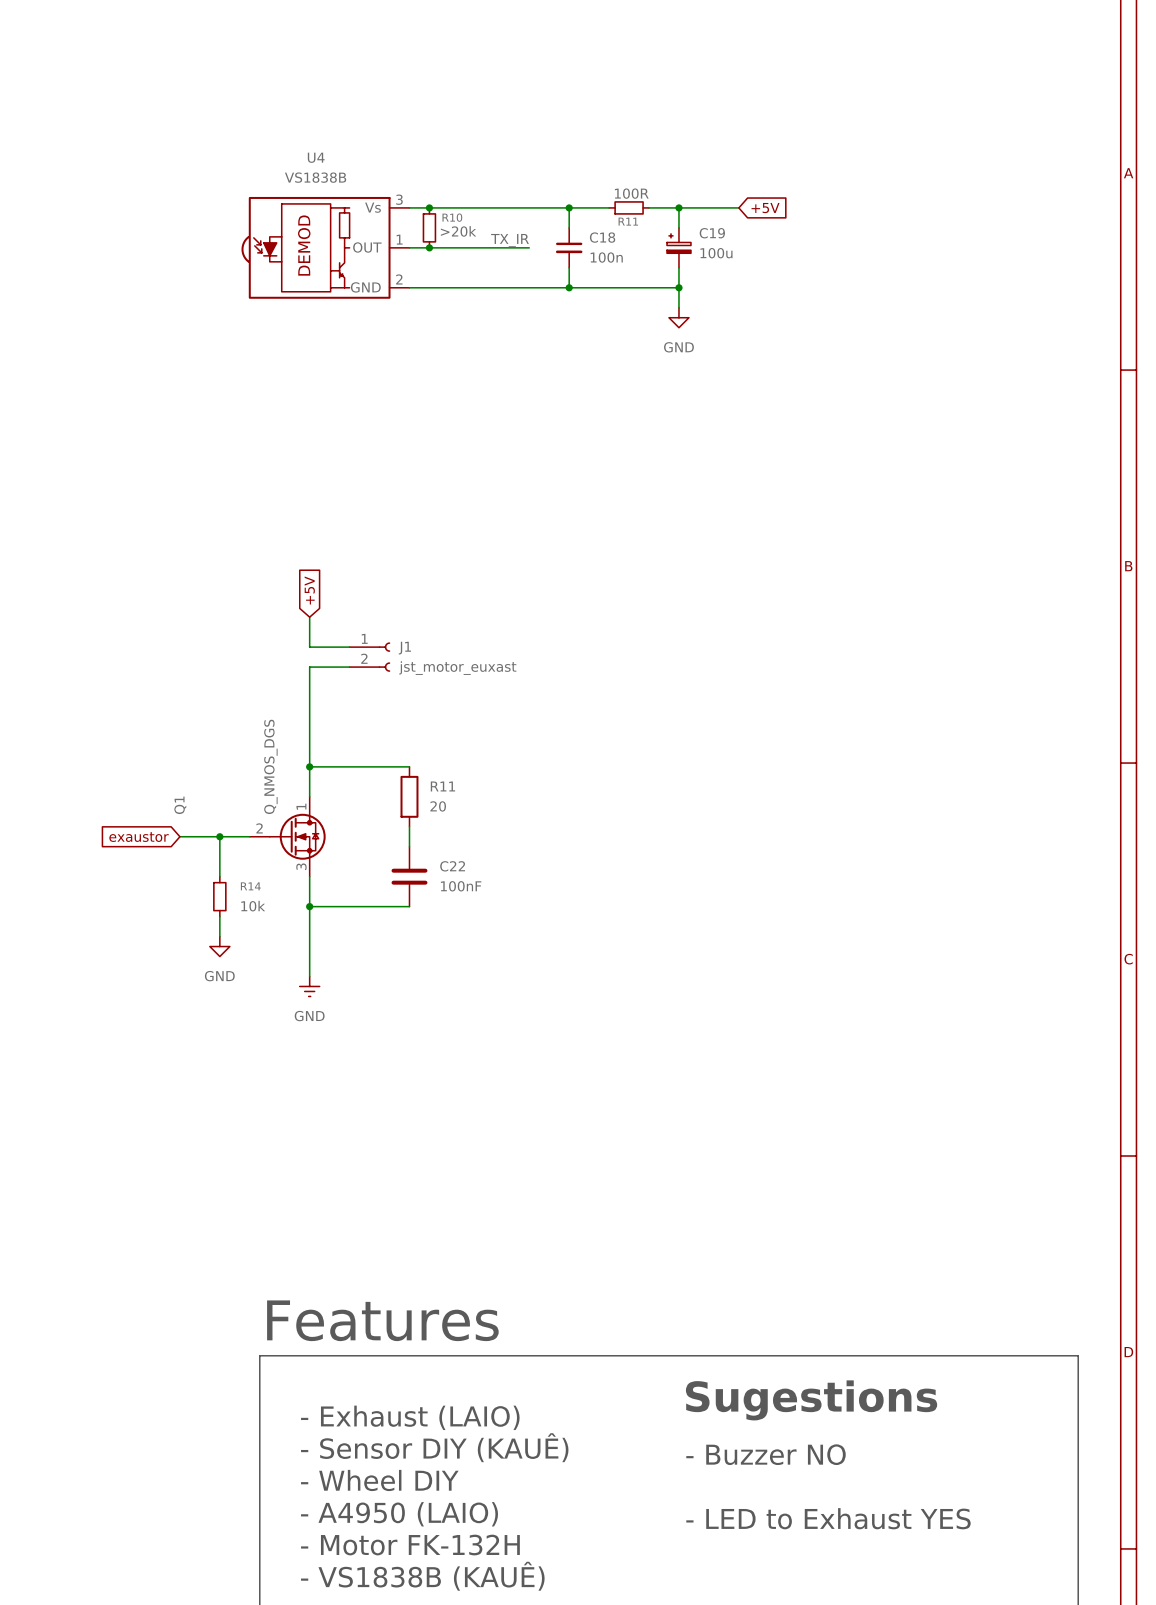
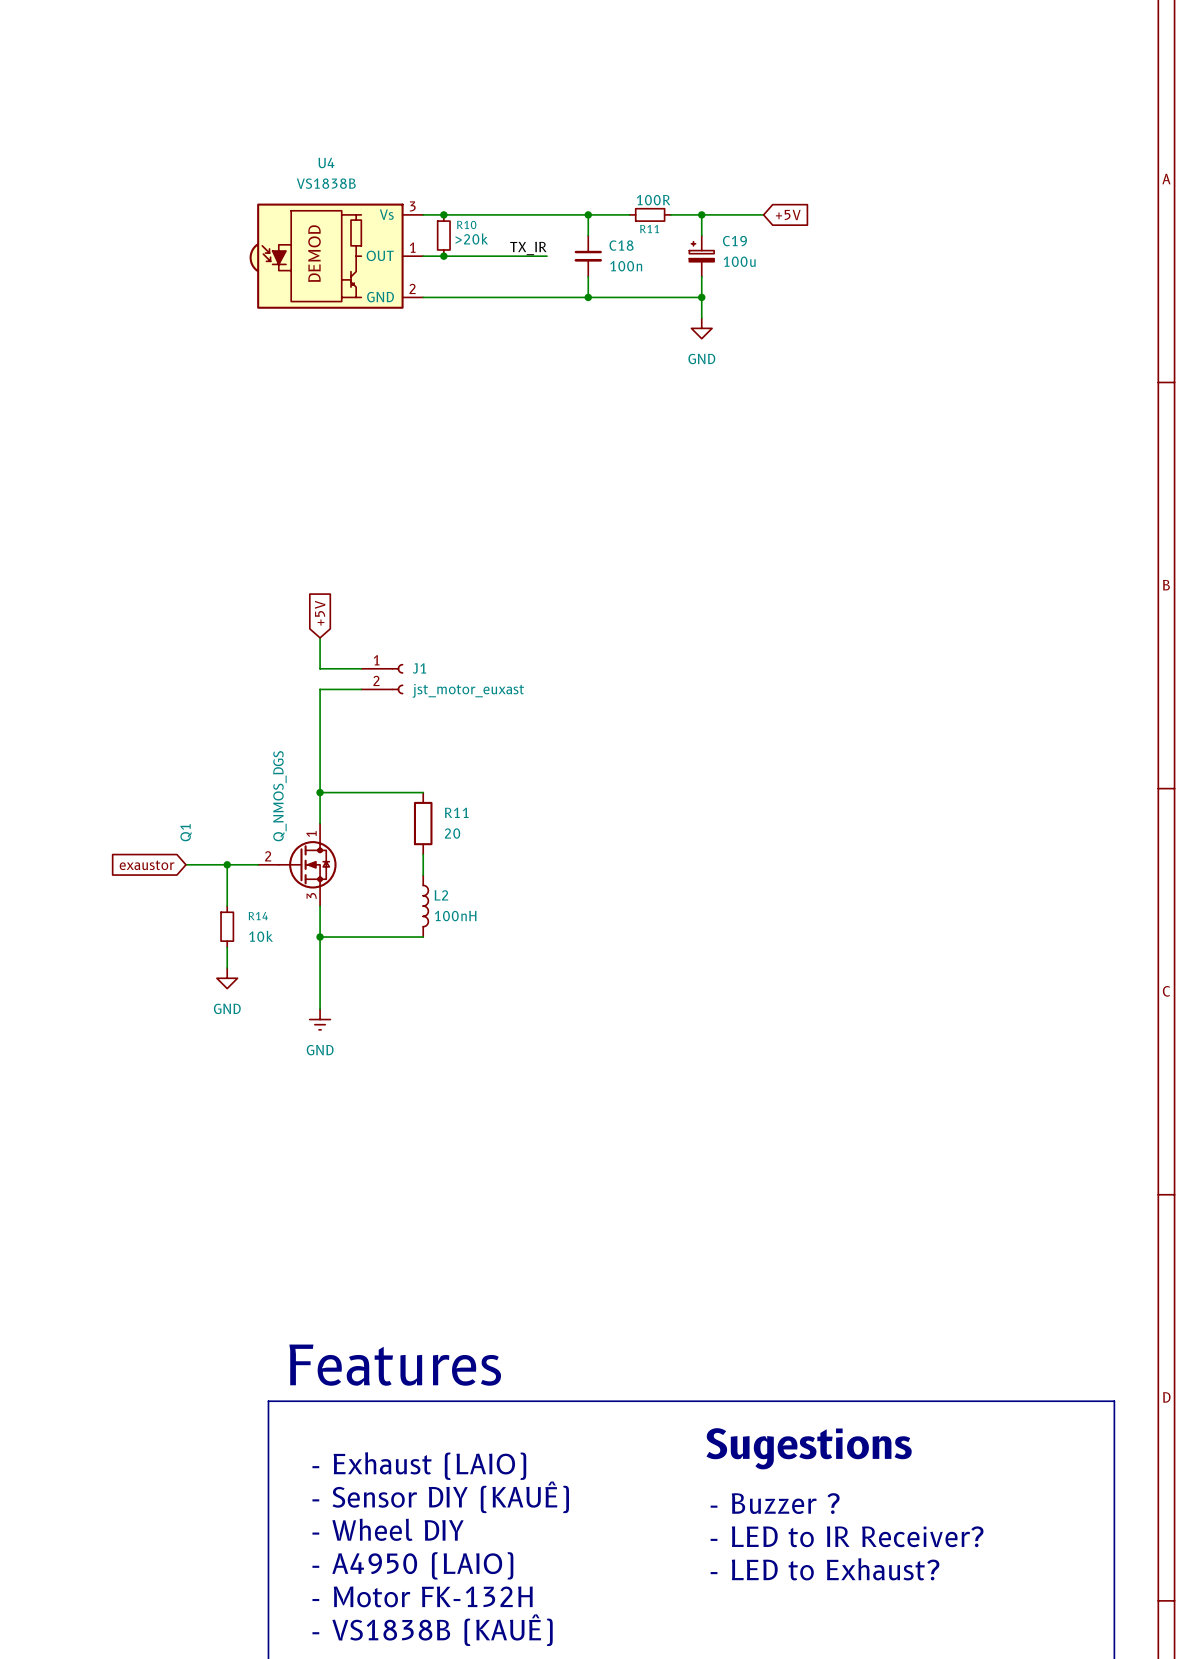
C22: 100nF (409, 876) -> none
L2: none -> 100nH (425, 906)
text: - Buzzer NO (766, 1454) -> - Buzzer ? (775, 1503)
text: none -> - LED to IR Receiver? (847, 1536)
text: - LED to Exhaust YES (828, 1518) -> - LED to Exhaust? (825, 1569)

